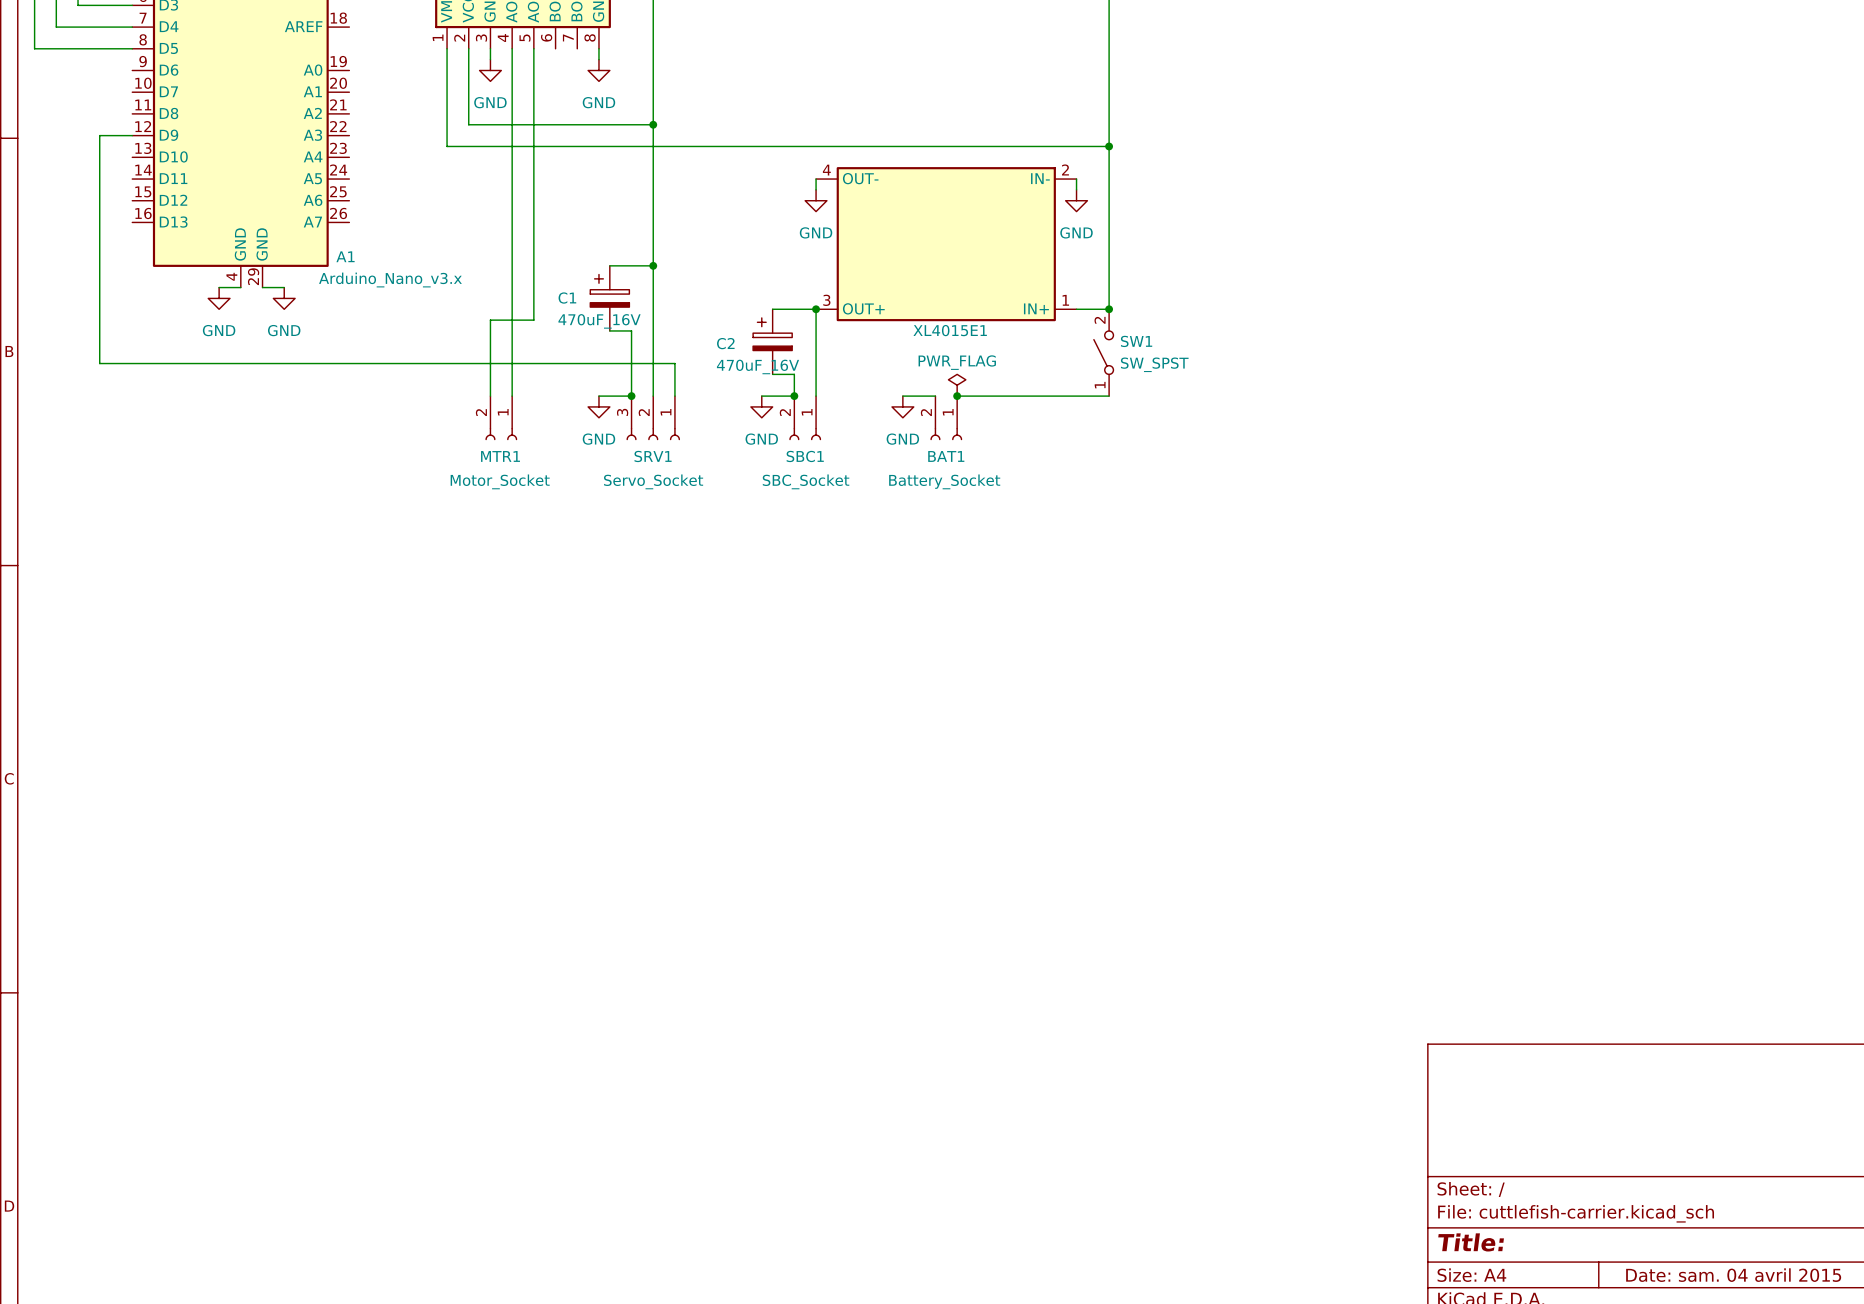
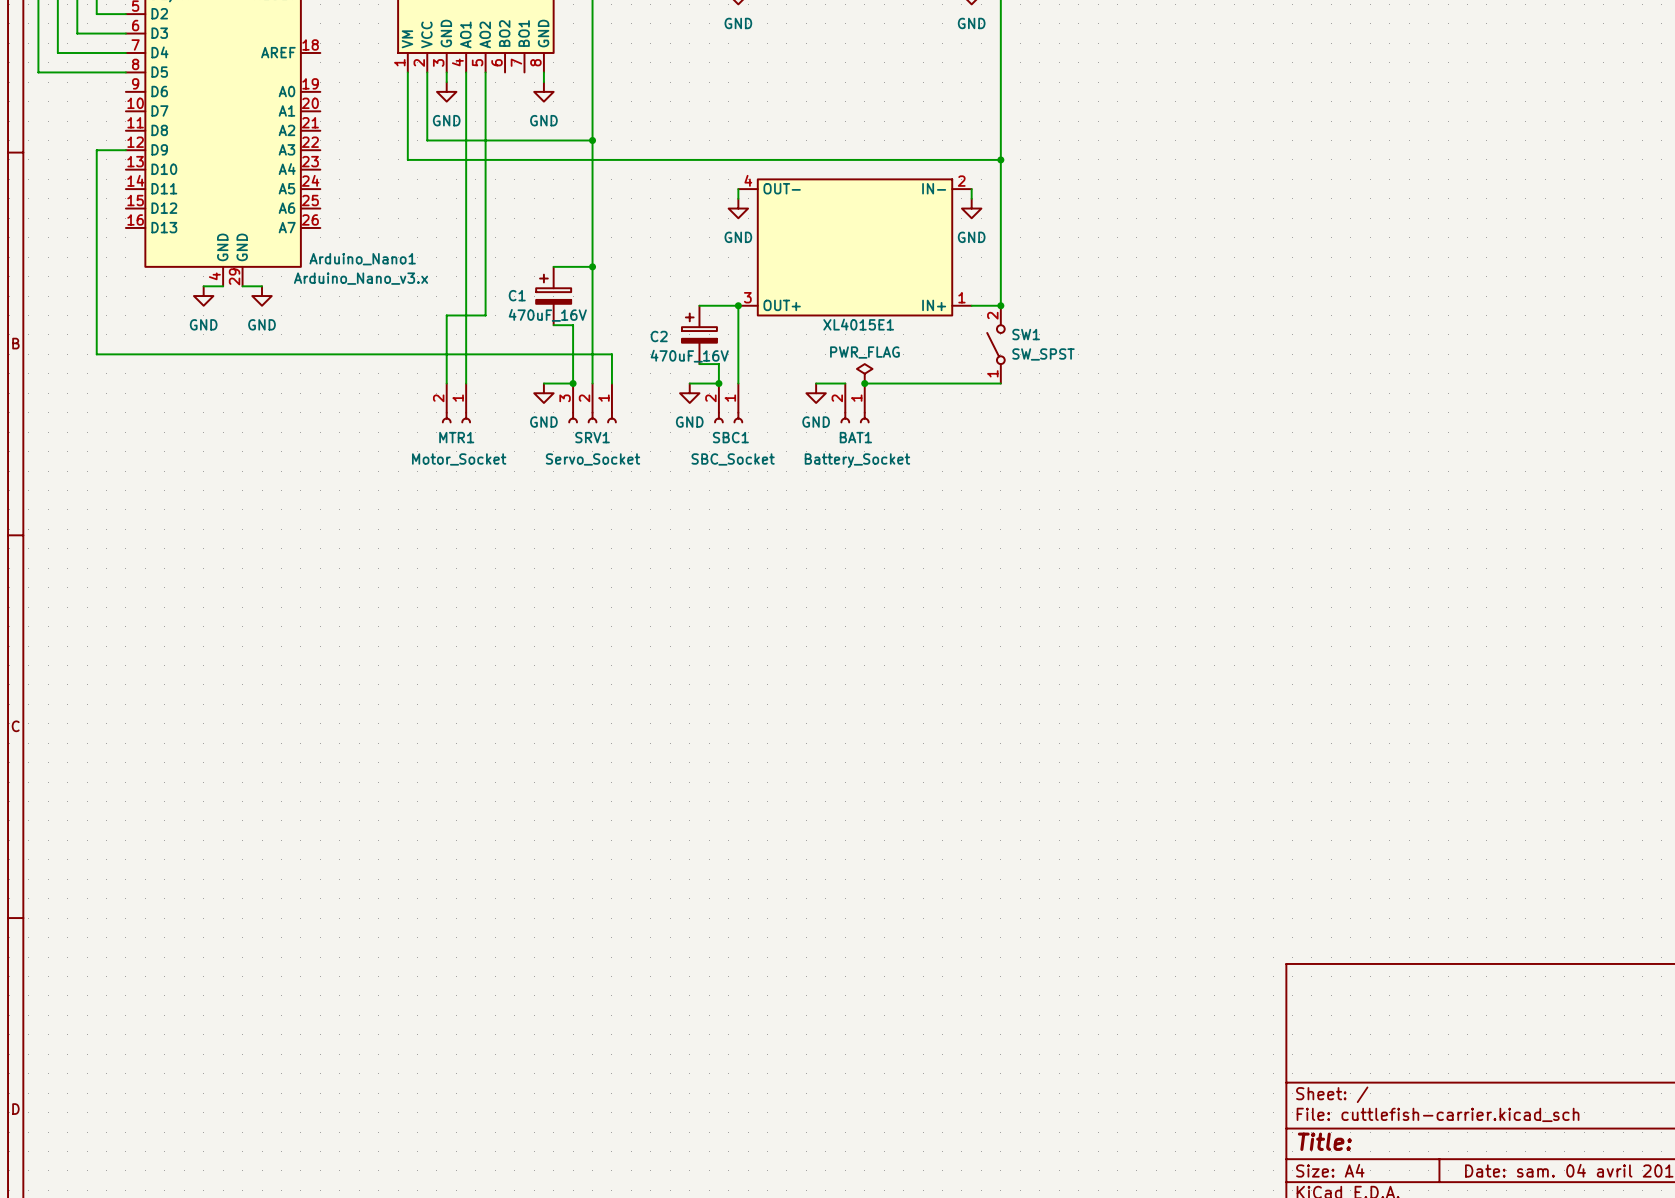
A1 name: A1 (345, 256) -> Arduino_Nano1 (362, 259)

